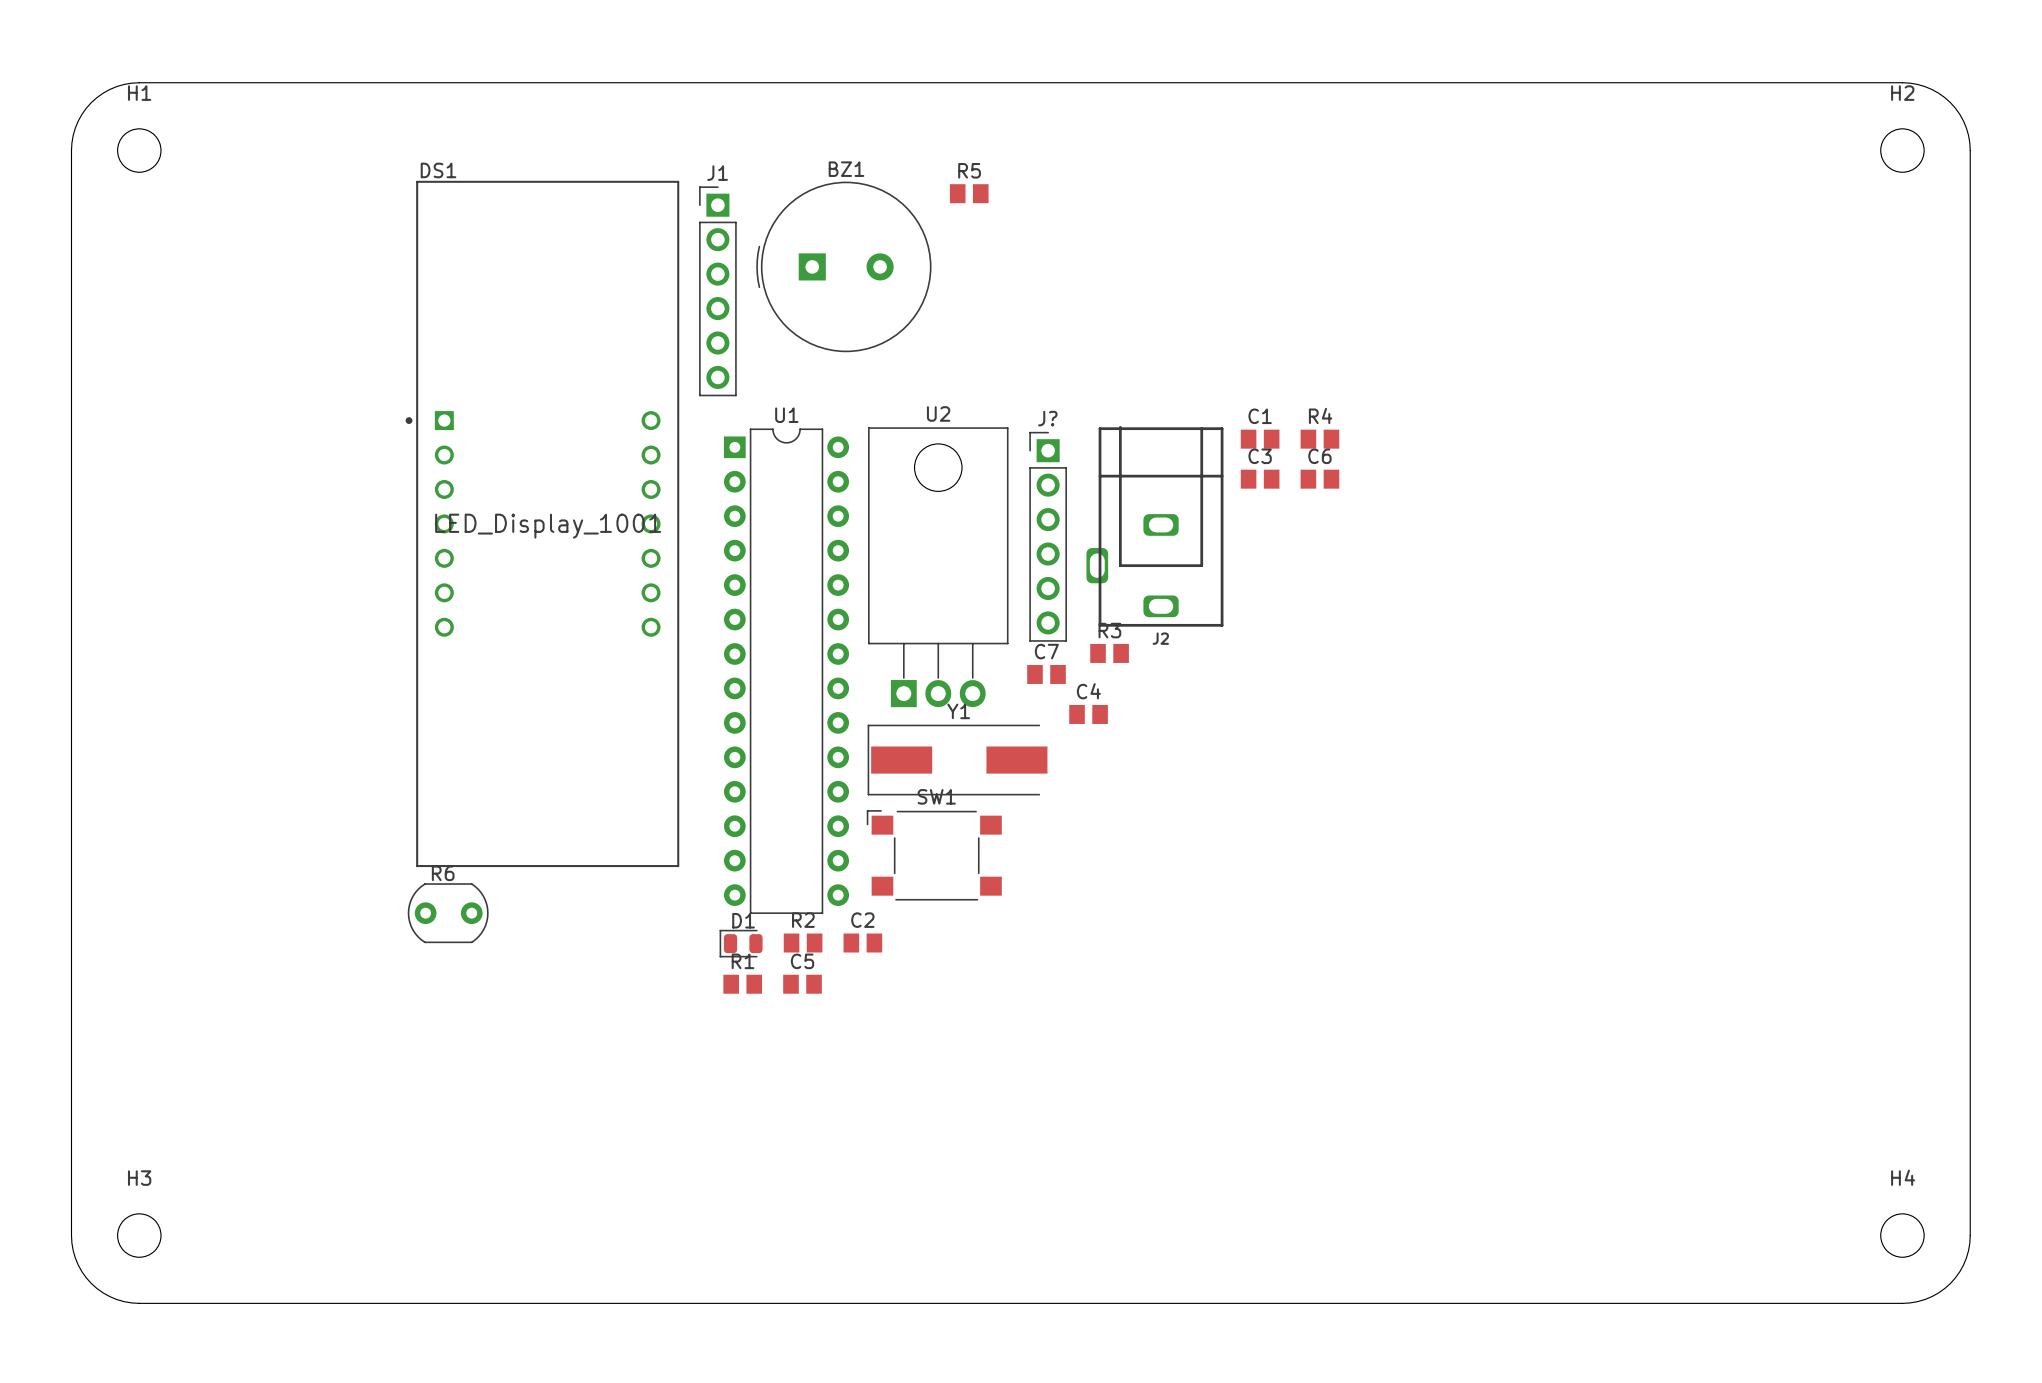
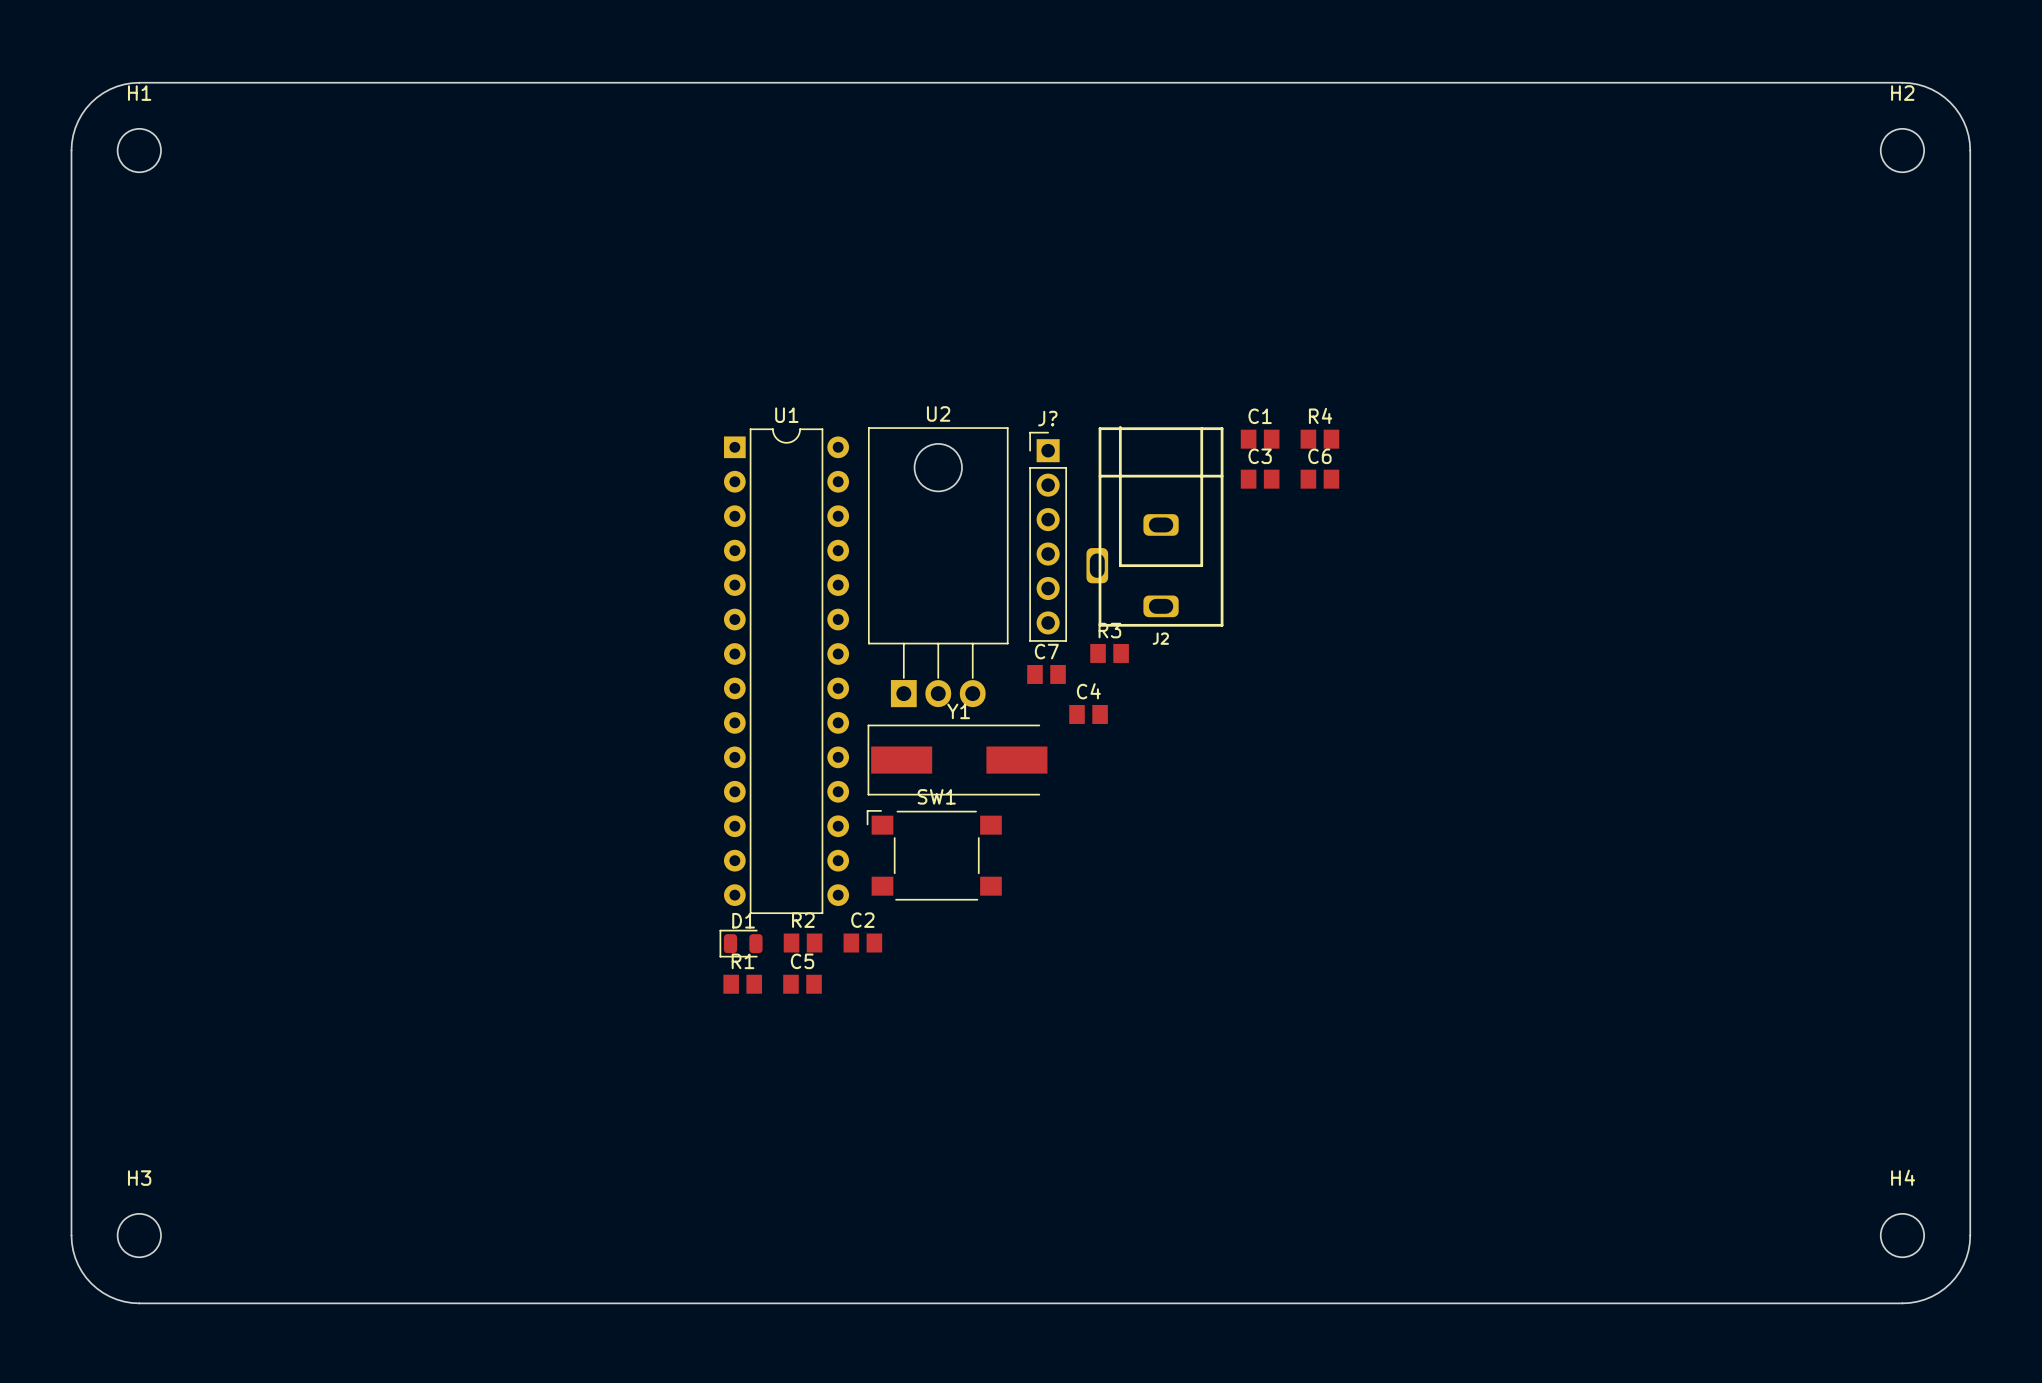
R5: (969, 193) -> none
BZ1: (843, 266) -> none
J1: (717, 291) -> none
DS1: LED_Display_1001 (542, 523) -> none
R6: (448, 913) -> none

